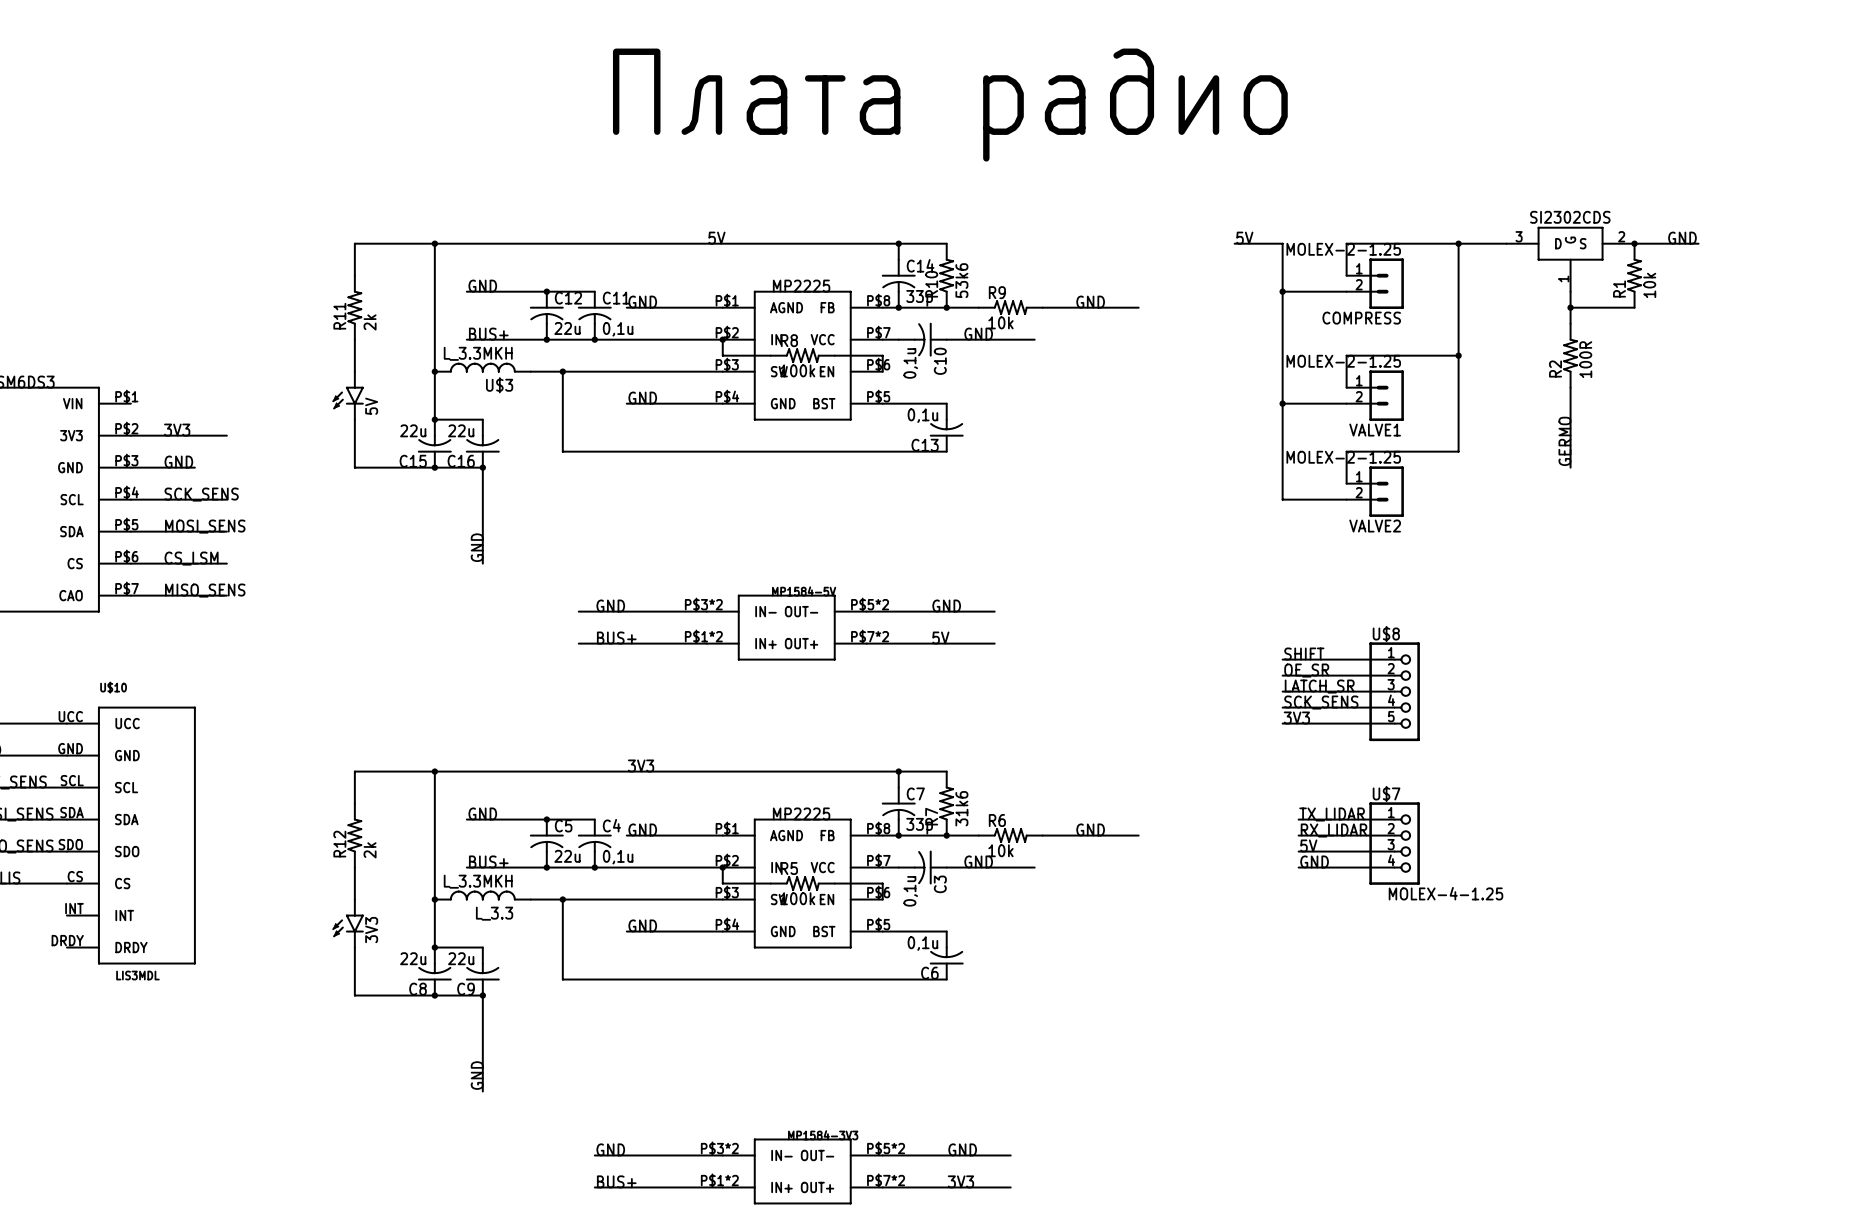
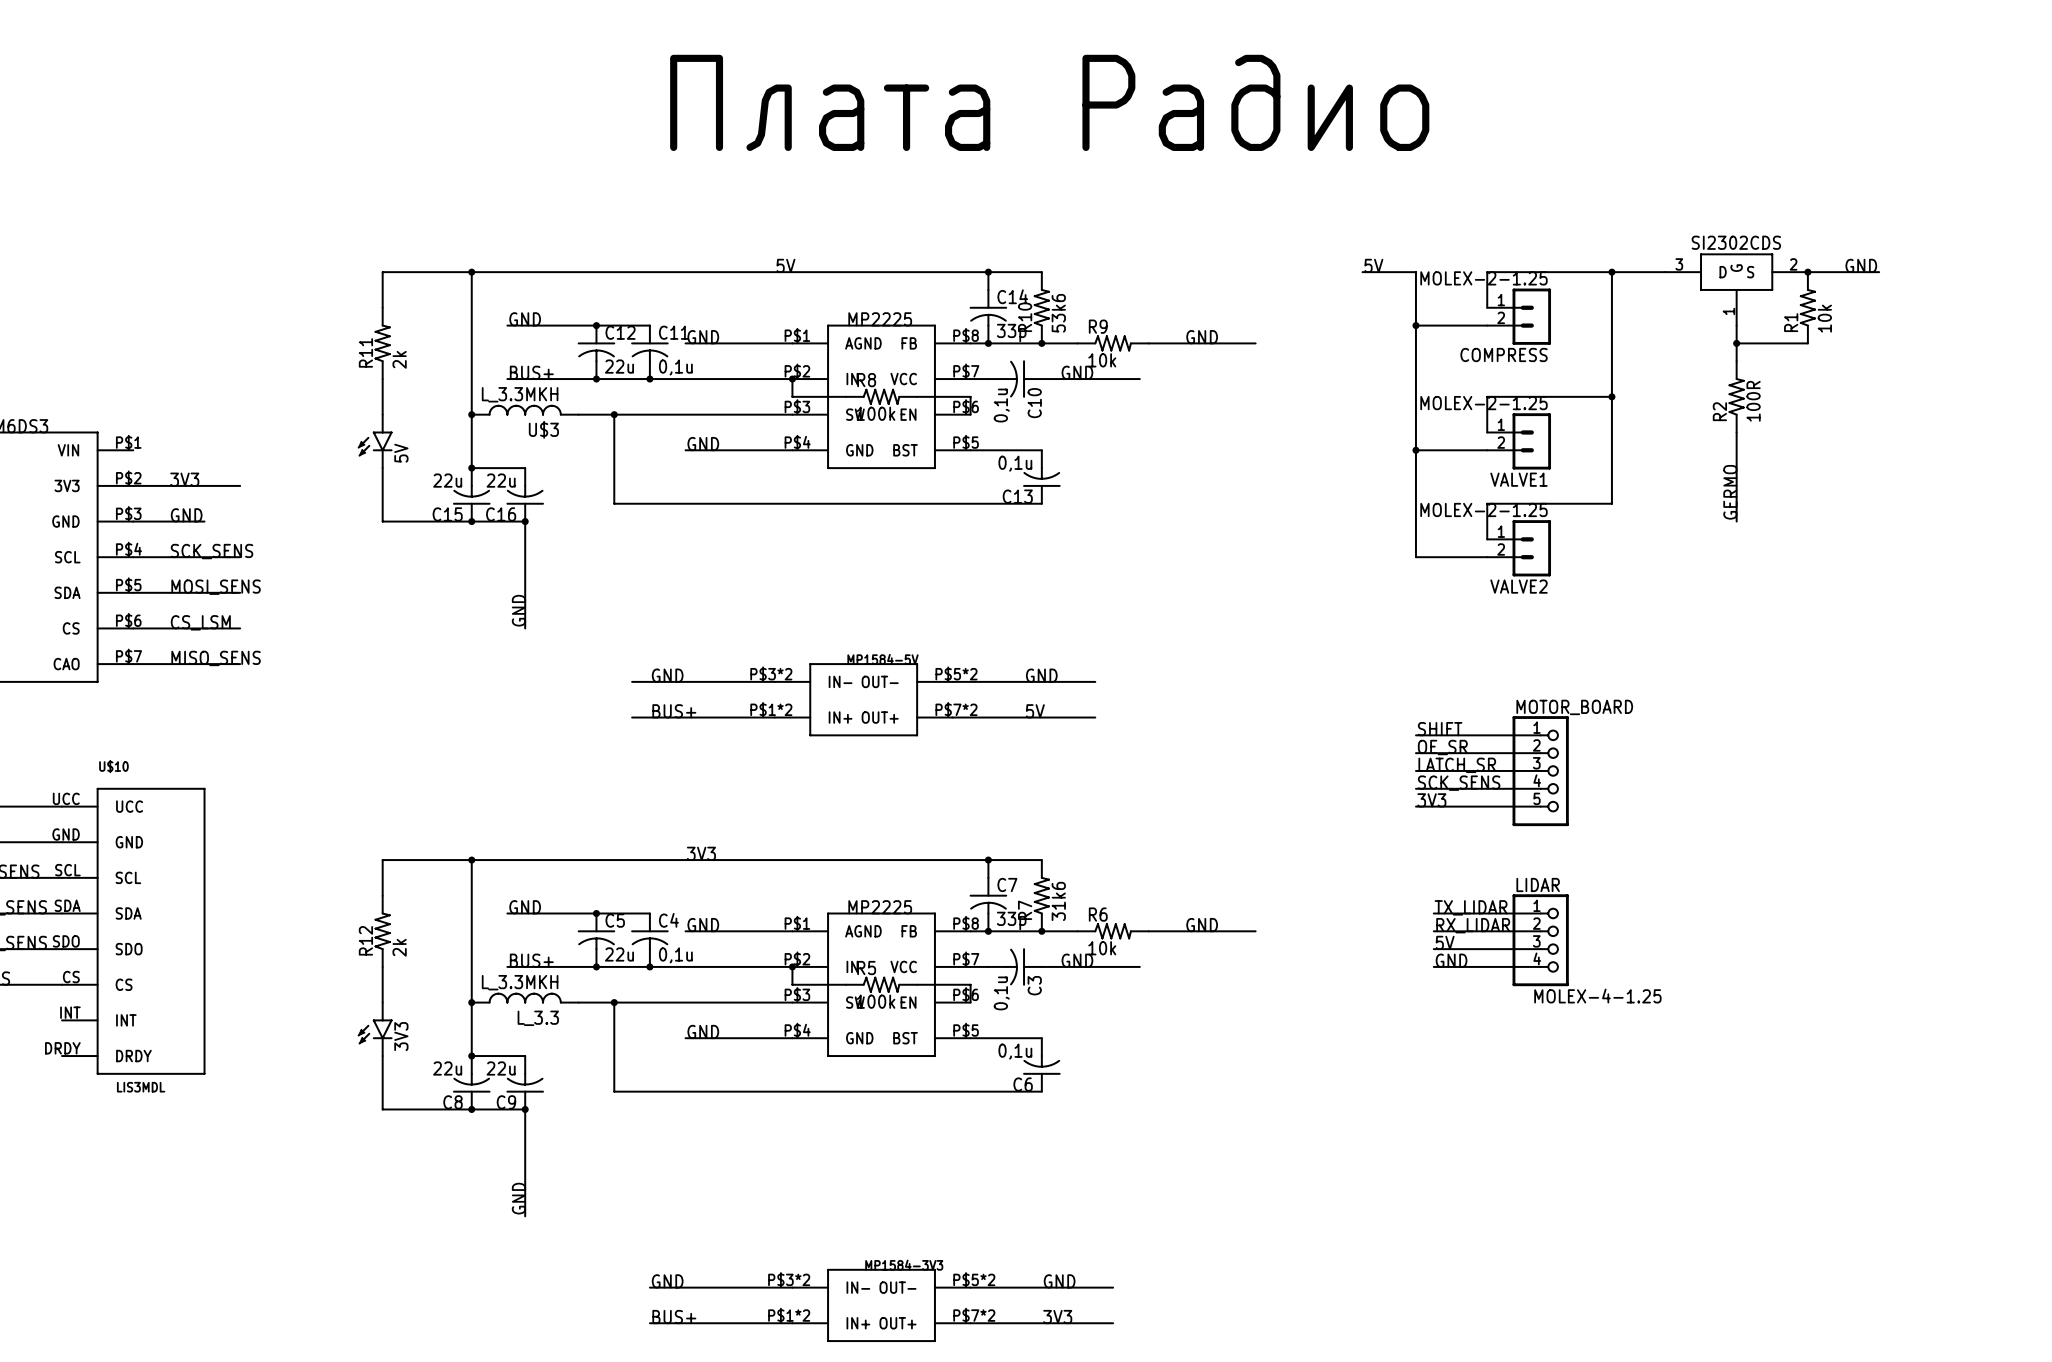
part value: Плата радио (950, 105) -> Плата Радио (1049, 102)
U$8 name: U$8 (1386, 634) -> MOTOR_BOARD (1574, 707)
U$7 name: U$7 (1386, 793) -> LIDAR (1538, 884)

